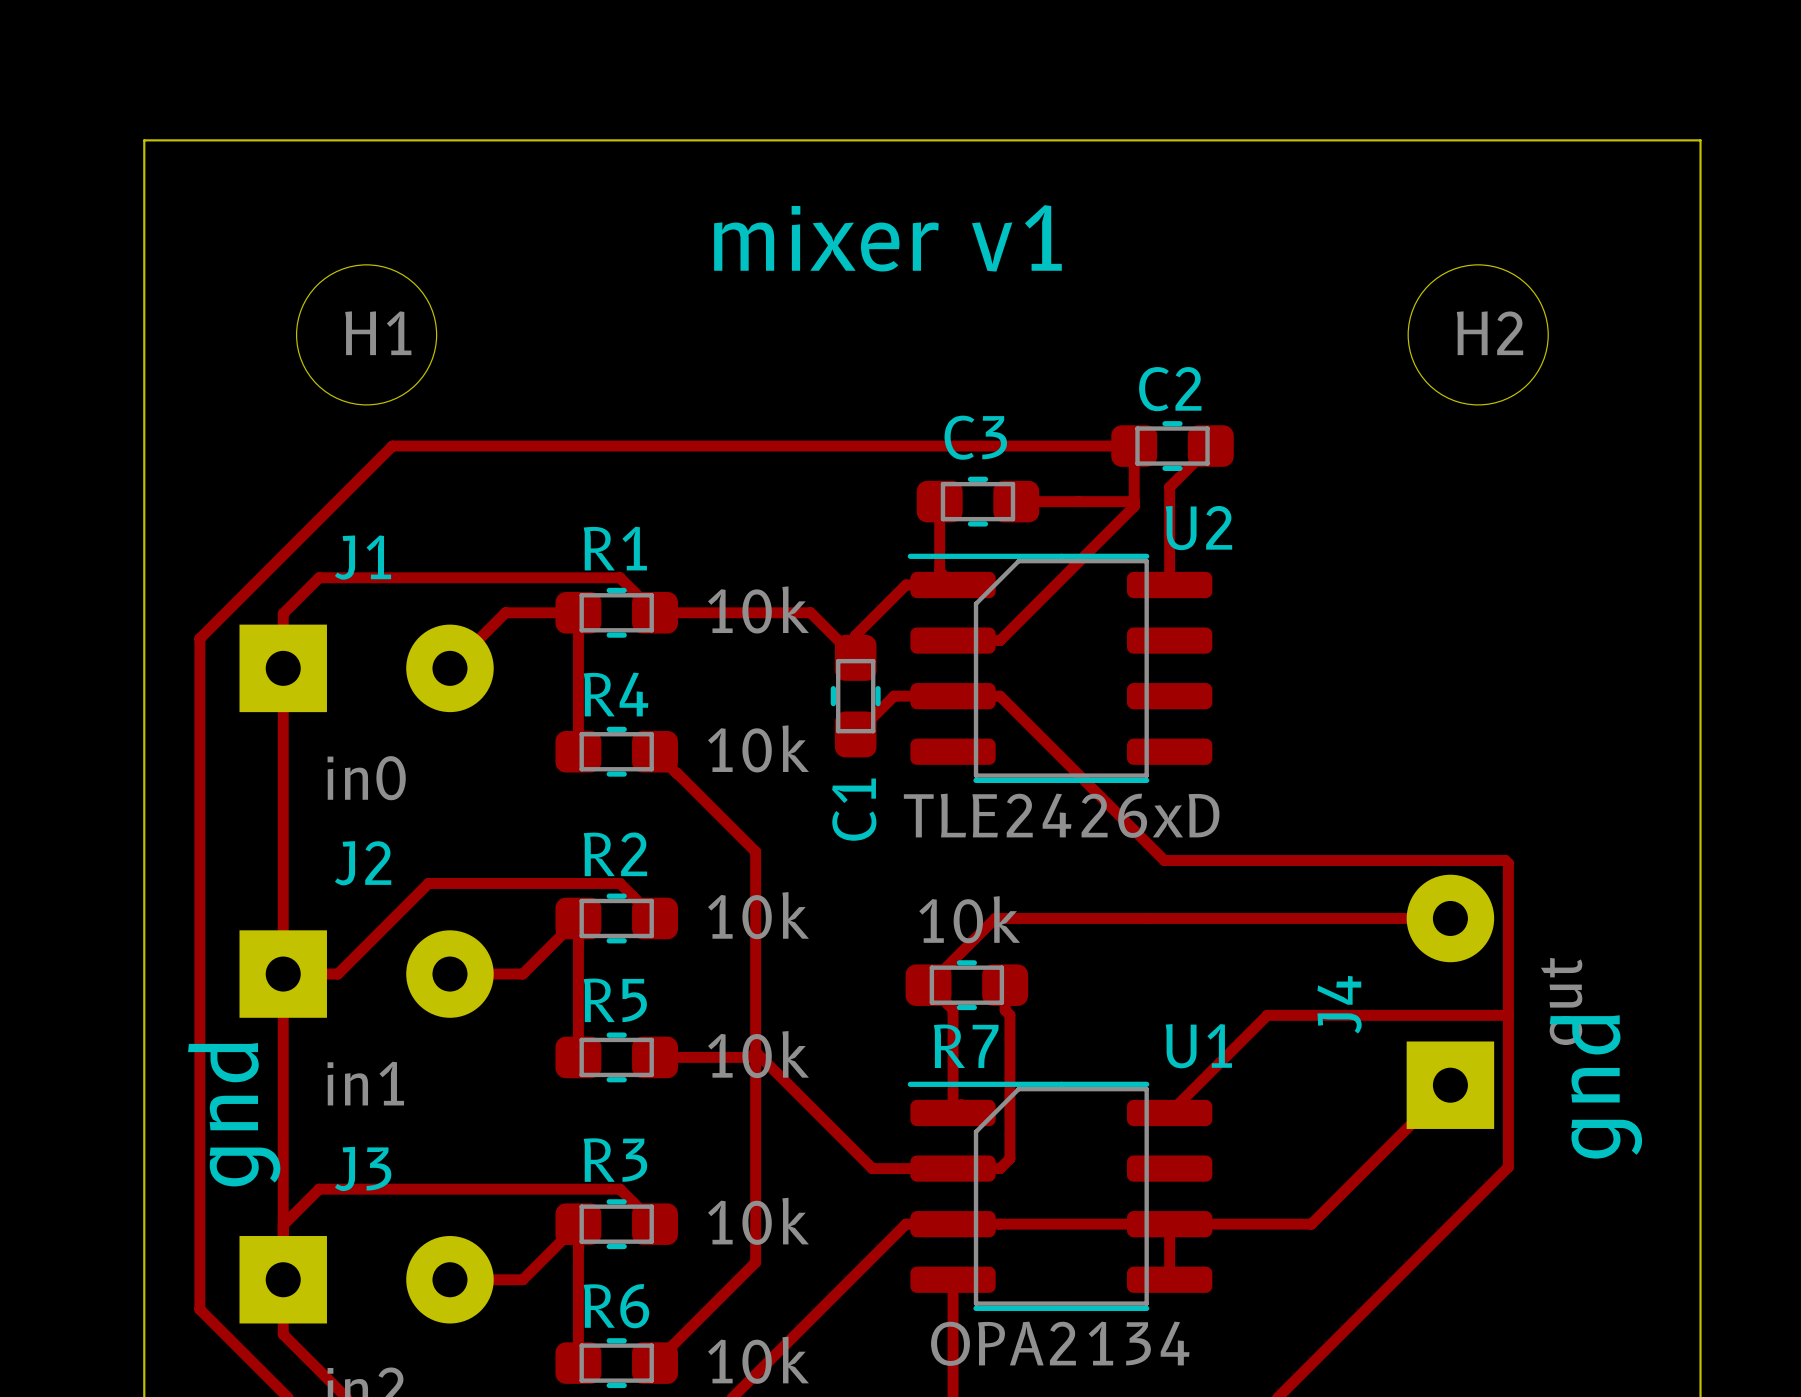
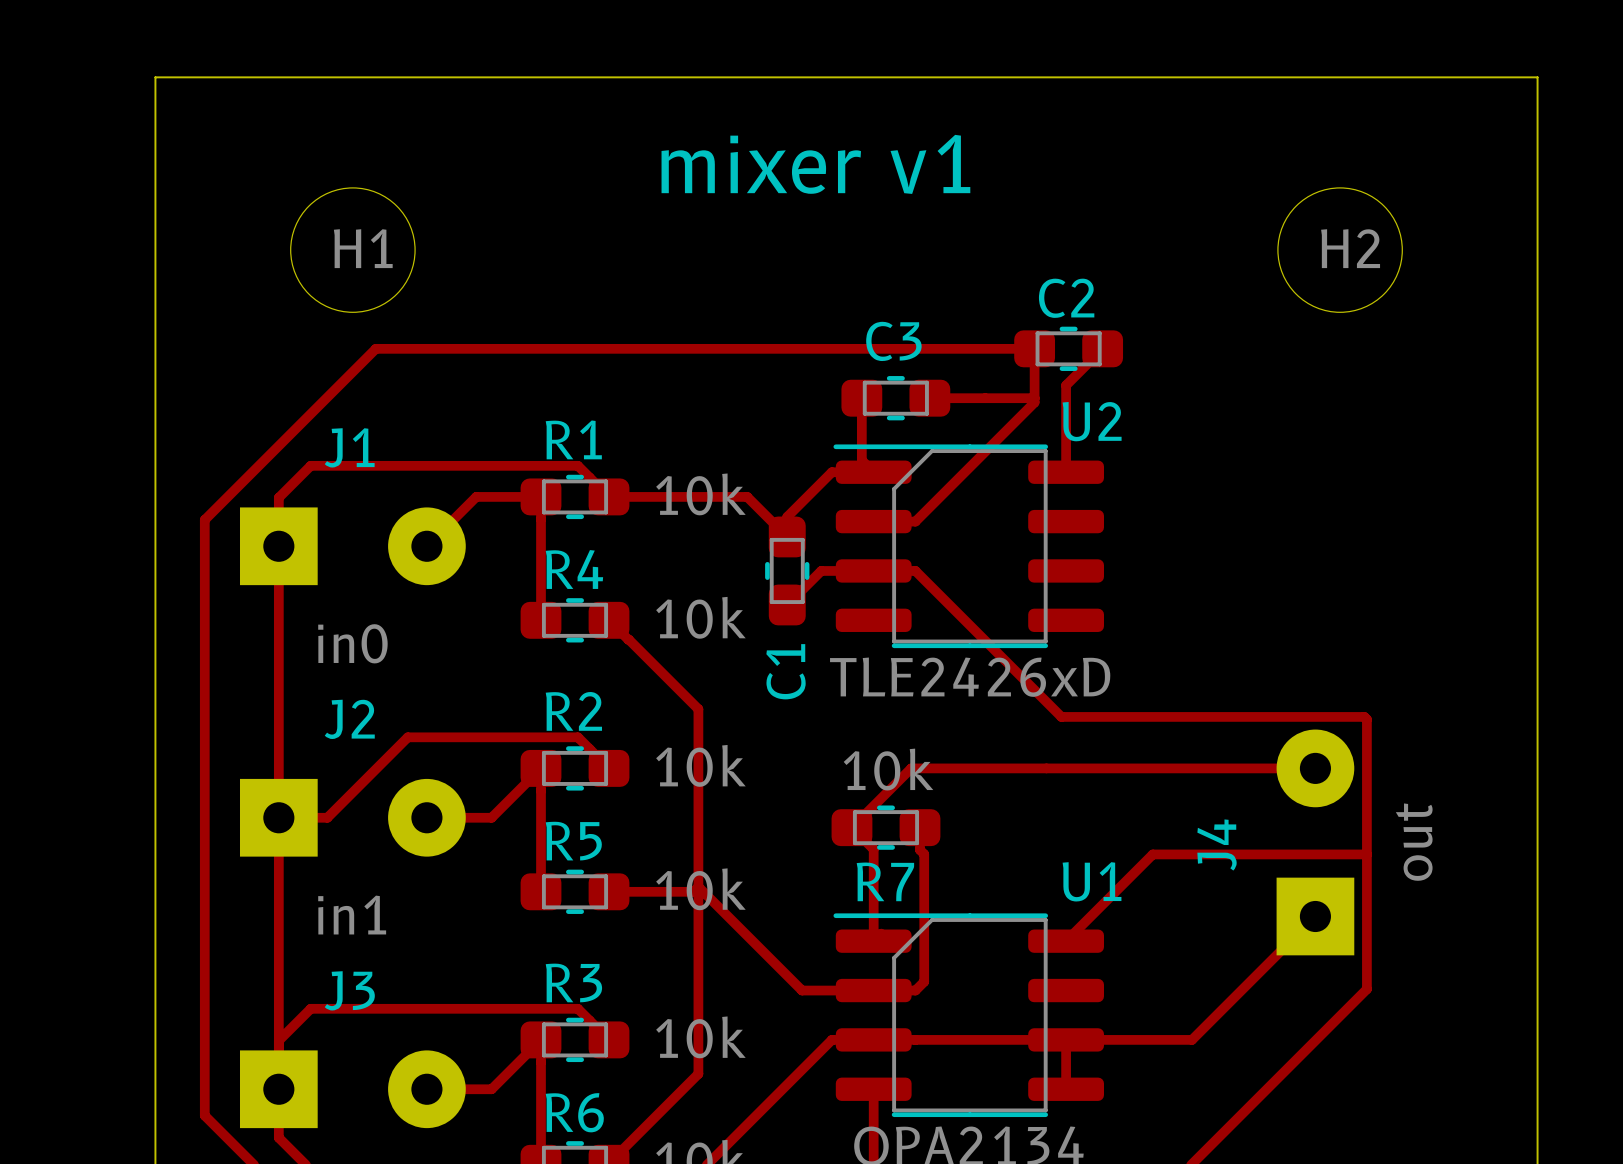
text: gnd (1595, 1086) -> none
text: gnd (234, 1114) -> none

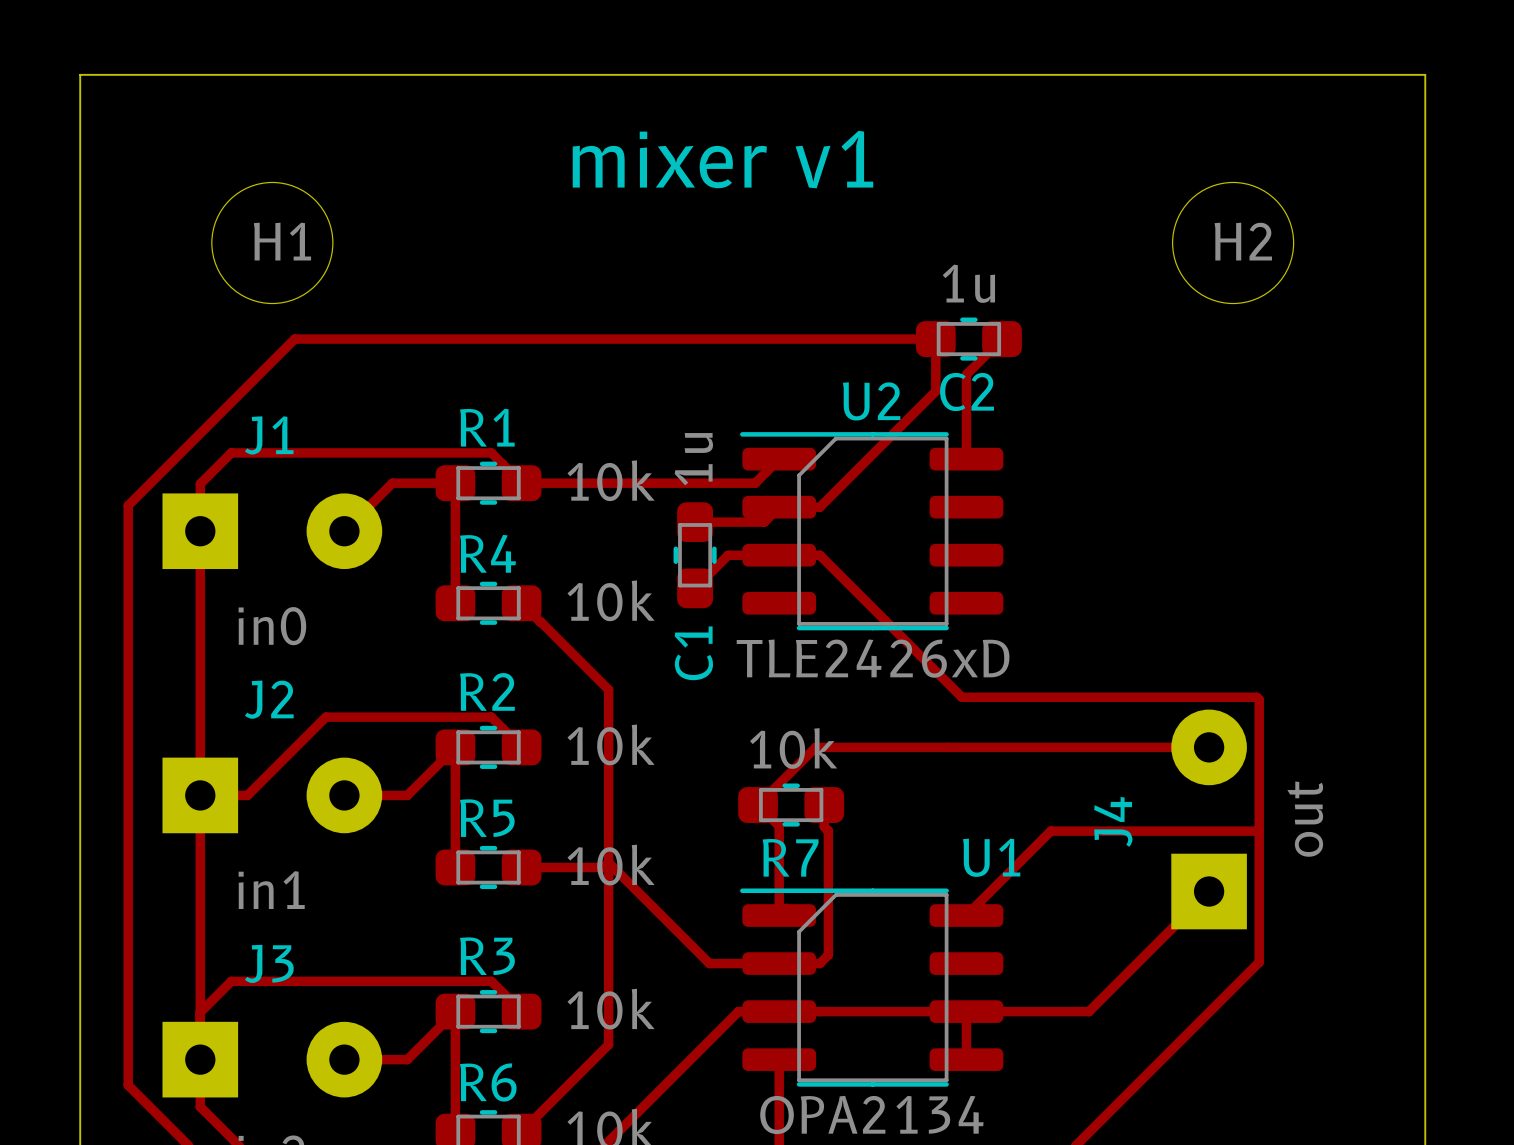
C2 value: none -> 1u (968, 283)
C2 name position: C2 (1066, 298) -> C2 (966, 391)
track: (861, 398) (861, 460) (873, 472) (831, 472) (787, 516) (787, 536) (747, 496) -> (779, 459) (755, 483) (656, 483)
C3: (895, 398) -> none
track: (929, 398) (1034, 398) -> none
U2 name position: U2 (1092, 421) -> U2 (871, 401)
C1 value: none -> 1u (693, 459)
track: none -> (779, 507) (764, 522) (695, 522)

